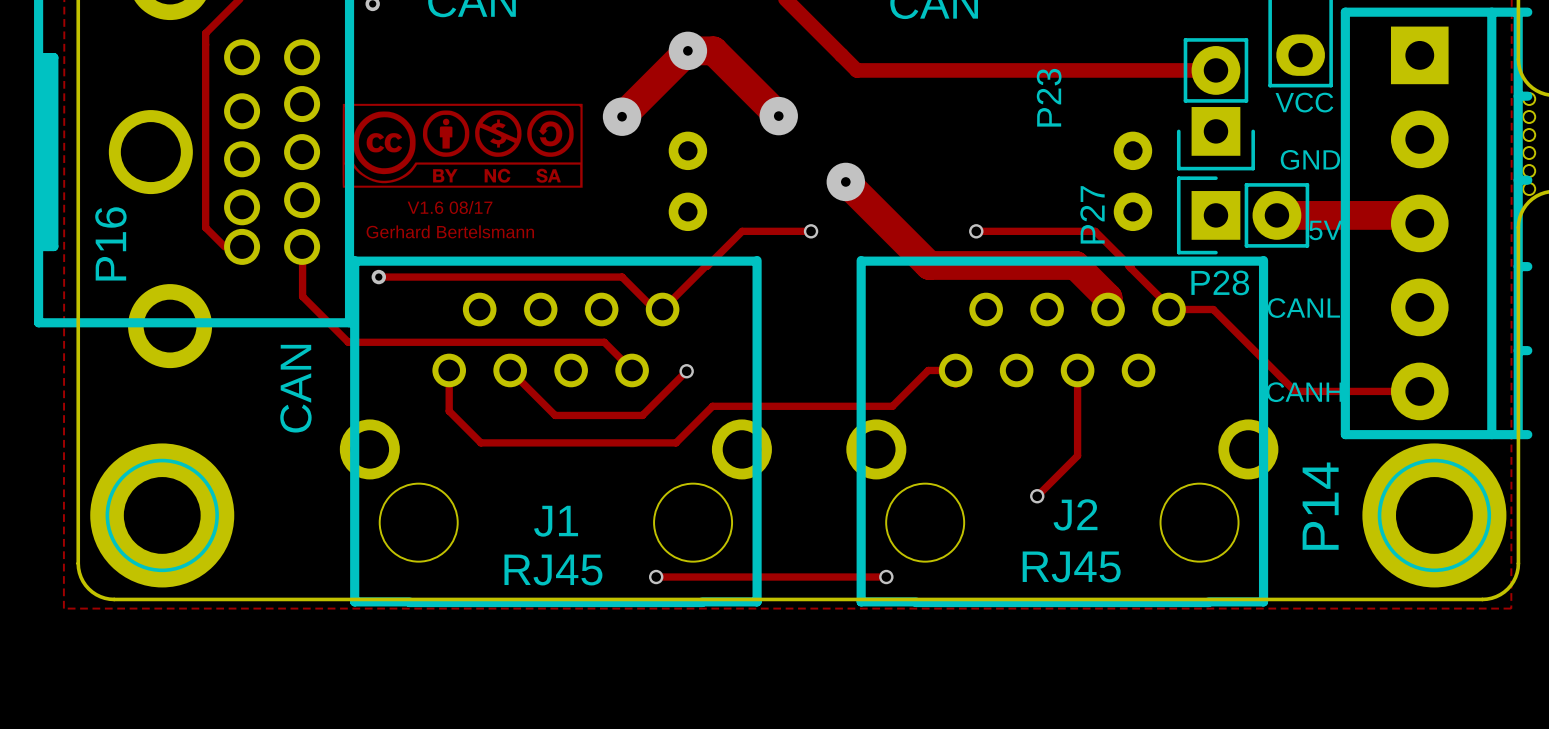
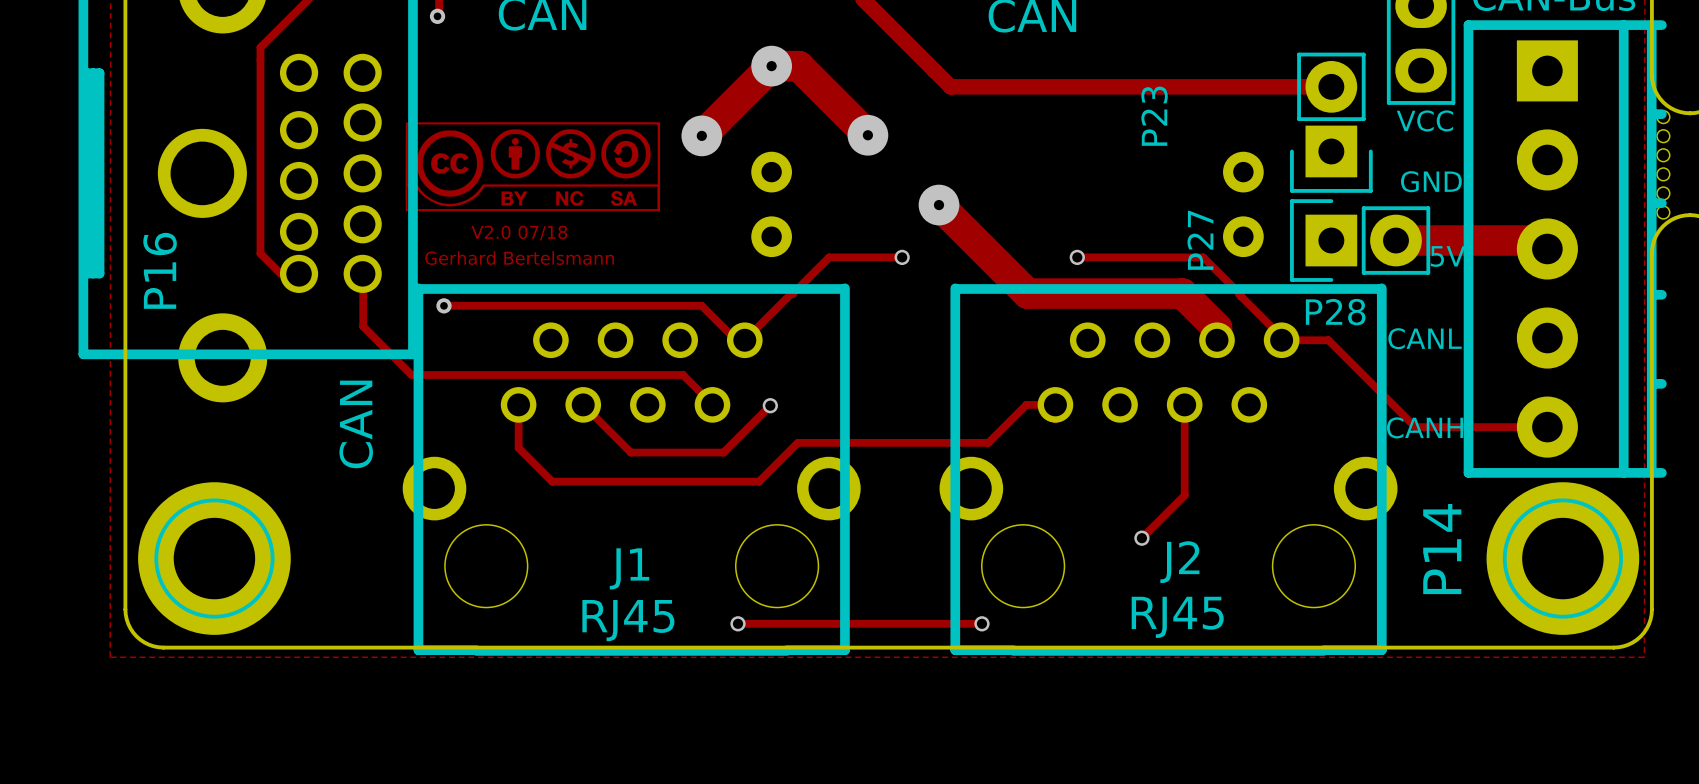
text: V1.6 08/17 (450, 207) -> V2.0 07/18 (519, 233)

